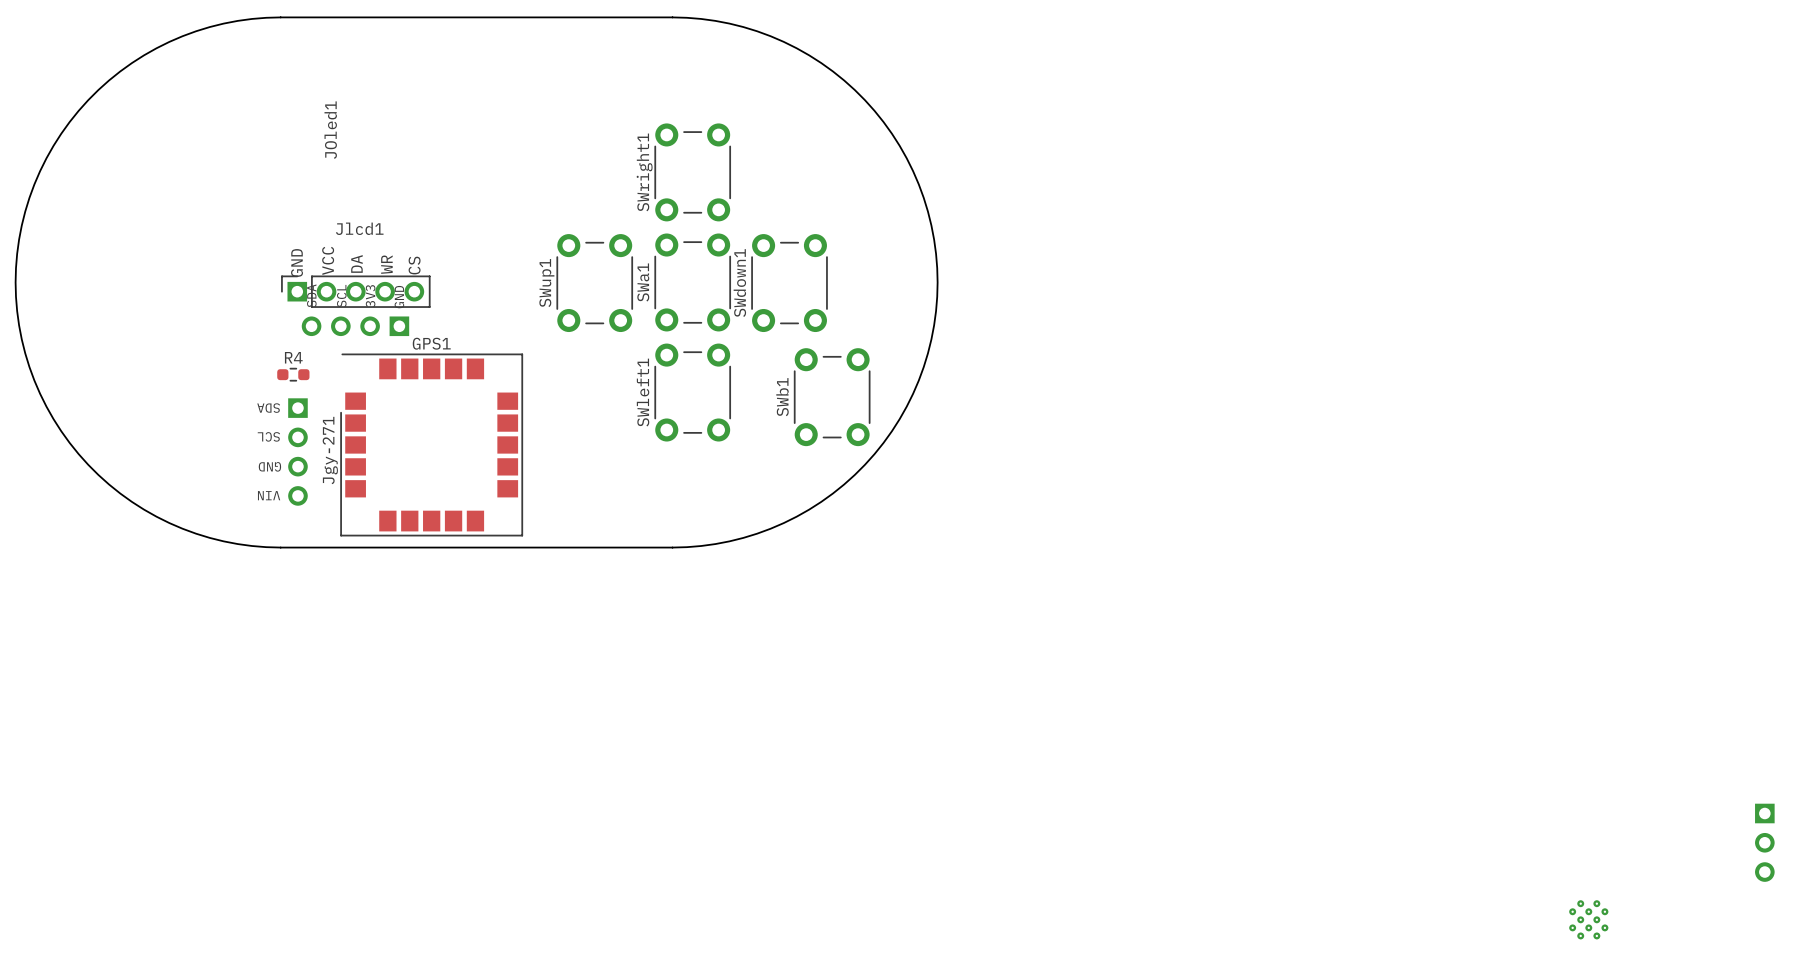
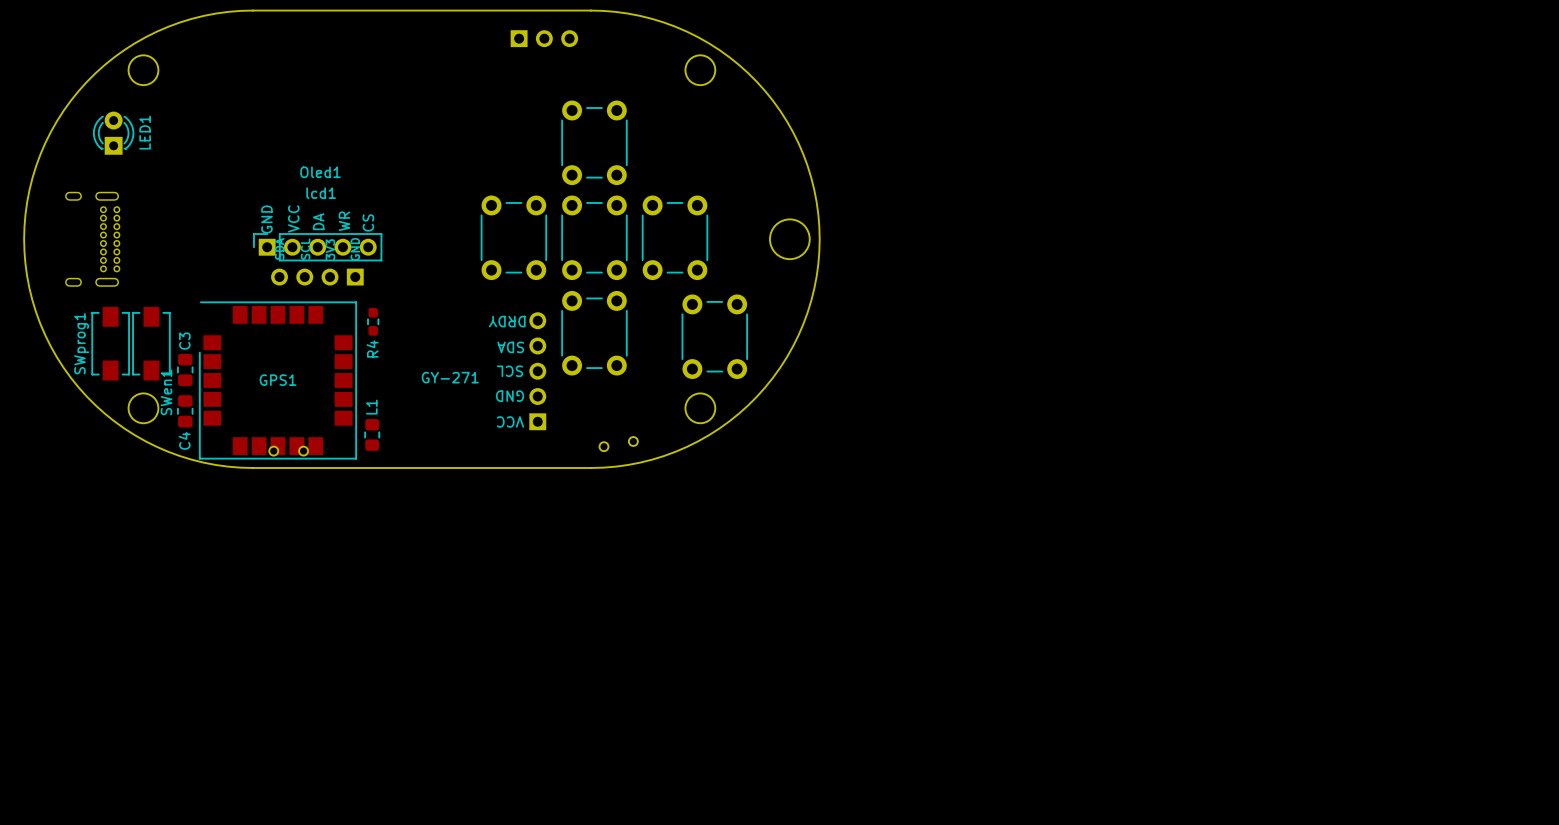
part: none -> (544, 38)
round board edge: none -> [128, 54, 159, 86]
round board edge: none -> [684, 54, 716, 86]
JOled1 name: JOled1 (330, 130) -> Oled1 (320, 172)
LED1: none -> (113, 133)
part: none -> (594, 142)
SWright1: (692, 172) -> none
Jlcd1 name: Jlcd1 (359, 228) -> lcd1 (321, 193)
round board edge: none -> [769, 218, 811, 260]
part: none -> (513, 237)
part: none -> (594, 237)
part: none -> (675, 237)
part: none -> (92, 239)
SWa1: (692, 282) -> none
SWup1: (594, 283) -> none
SWdown1: (789, 283) -> none
GPS1 name position: GPS1 (431, 343) -> GPS1 (277, 380)
R4 name position: R4 (293, 357) -> R4 (372, 349)
R4 rotation: 0° (293, 374) -> 90° clockwise (373, 321)
R4 position: (293, 374) -> (373, 321)
part: none -> (594, 333)
SWleft1: (692, 392) -> none
part: none -> (714, 336)
SWb1: (832, 397) -> none
SWprog1: none -> (110, 343)
SWen1: none -> (151, 343)
C3: none -> (185, 369)
GY-271: none -> (537, 371)
GPS1 position: (431, 444) -> (277, 380)
Jgy-271: (297, 452) -> none
round board edge: none -> [128, 392, 159, 424]
round board edge: none -> [684, 392, 716, 424]
C4: none -> (185, 411)
L1: none -> (372, 434)
part: none -> (618, 444)
part: none -> (288, 451)
part: (1764, 842) -> none
part: (1588, 919) -> none

